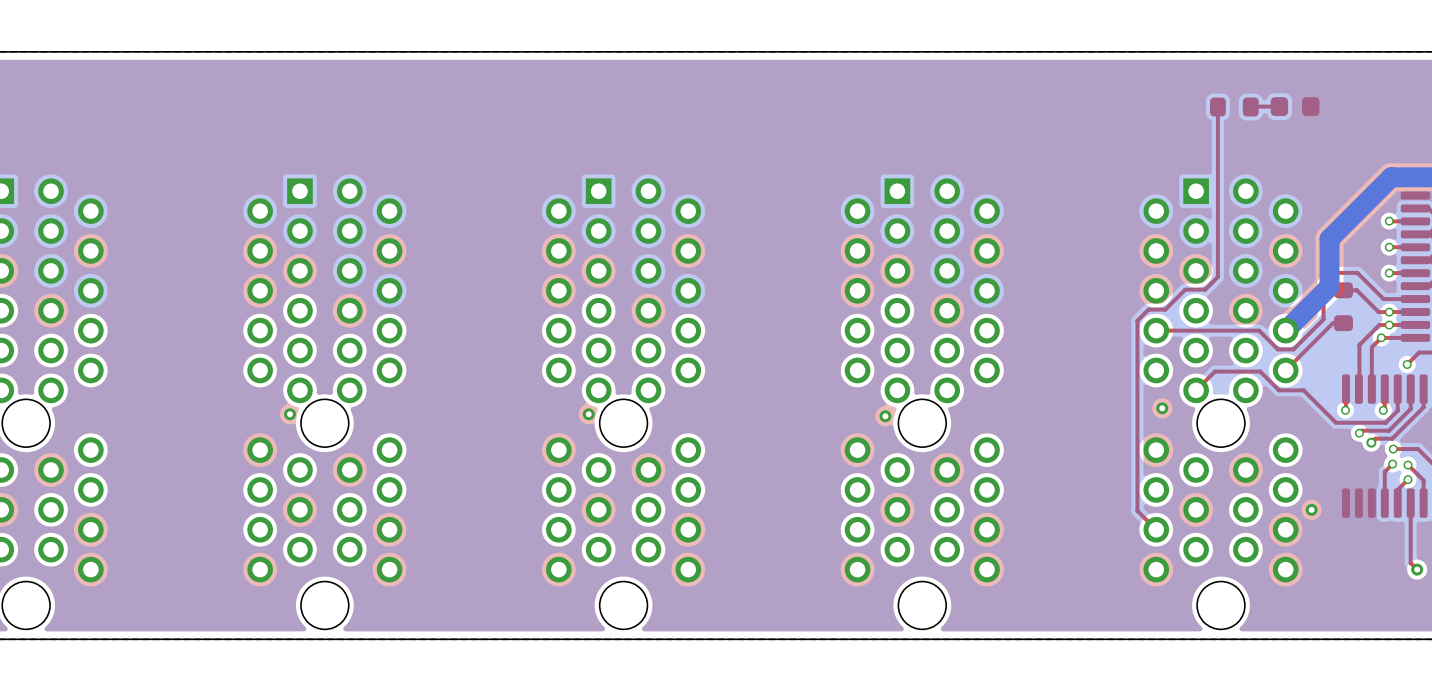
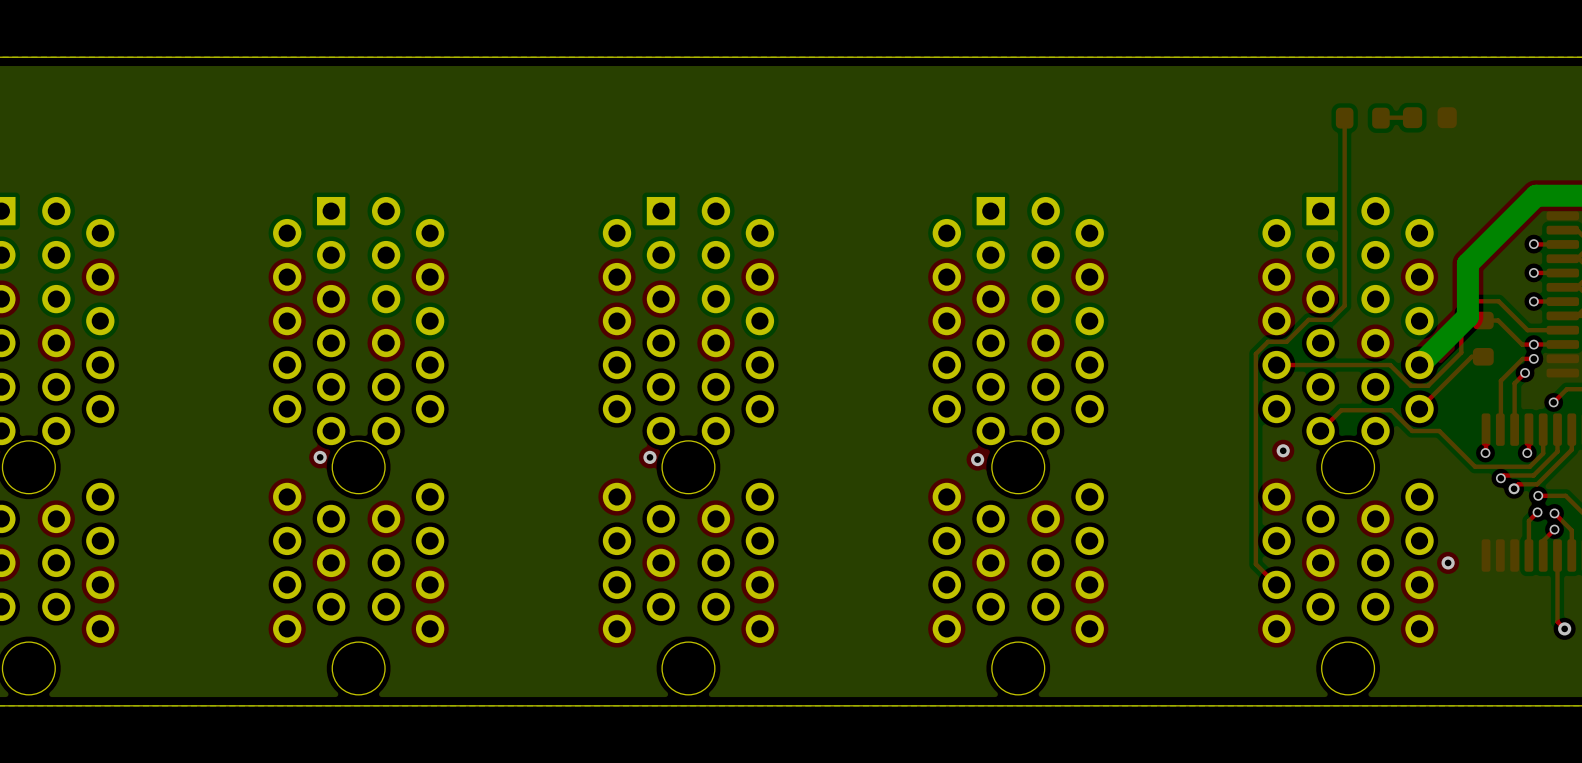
top track: (1415, 337) (1381, 337) -> none

